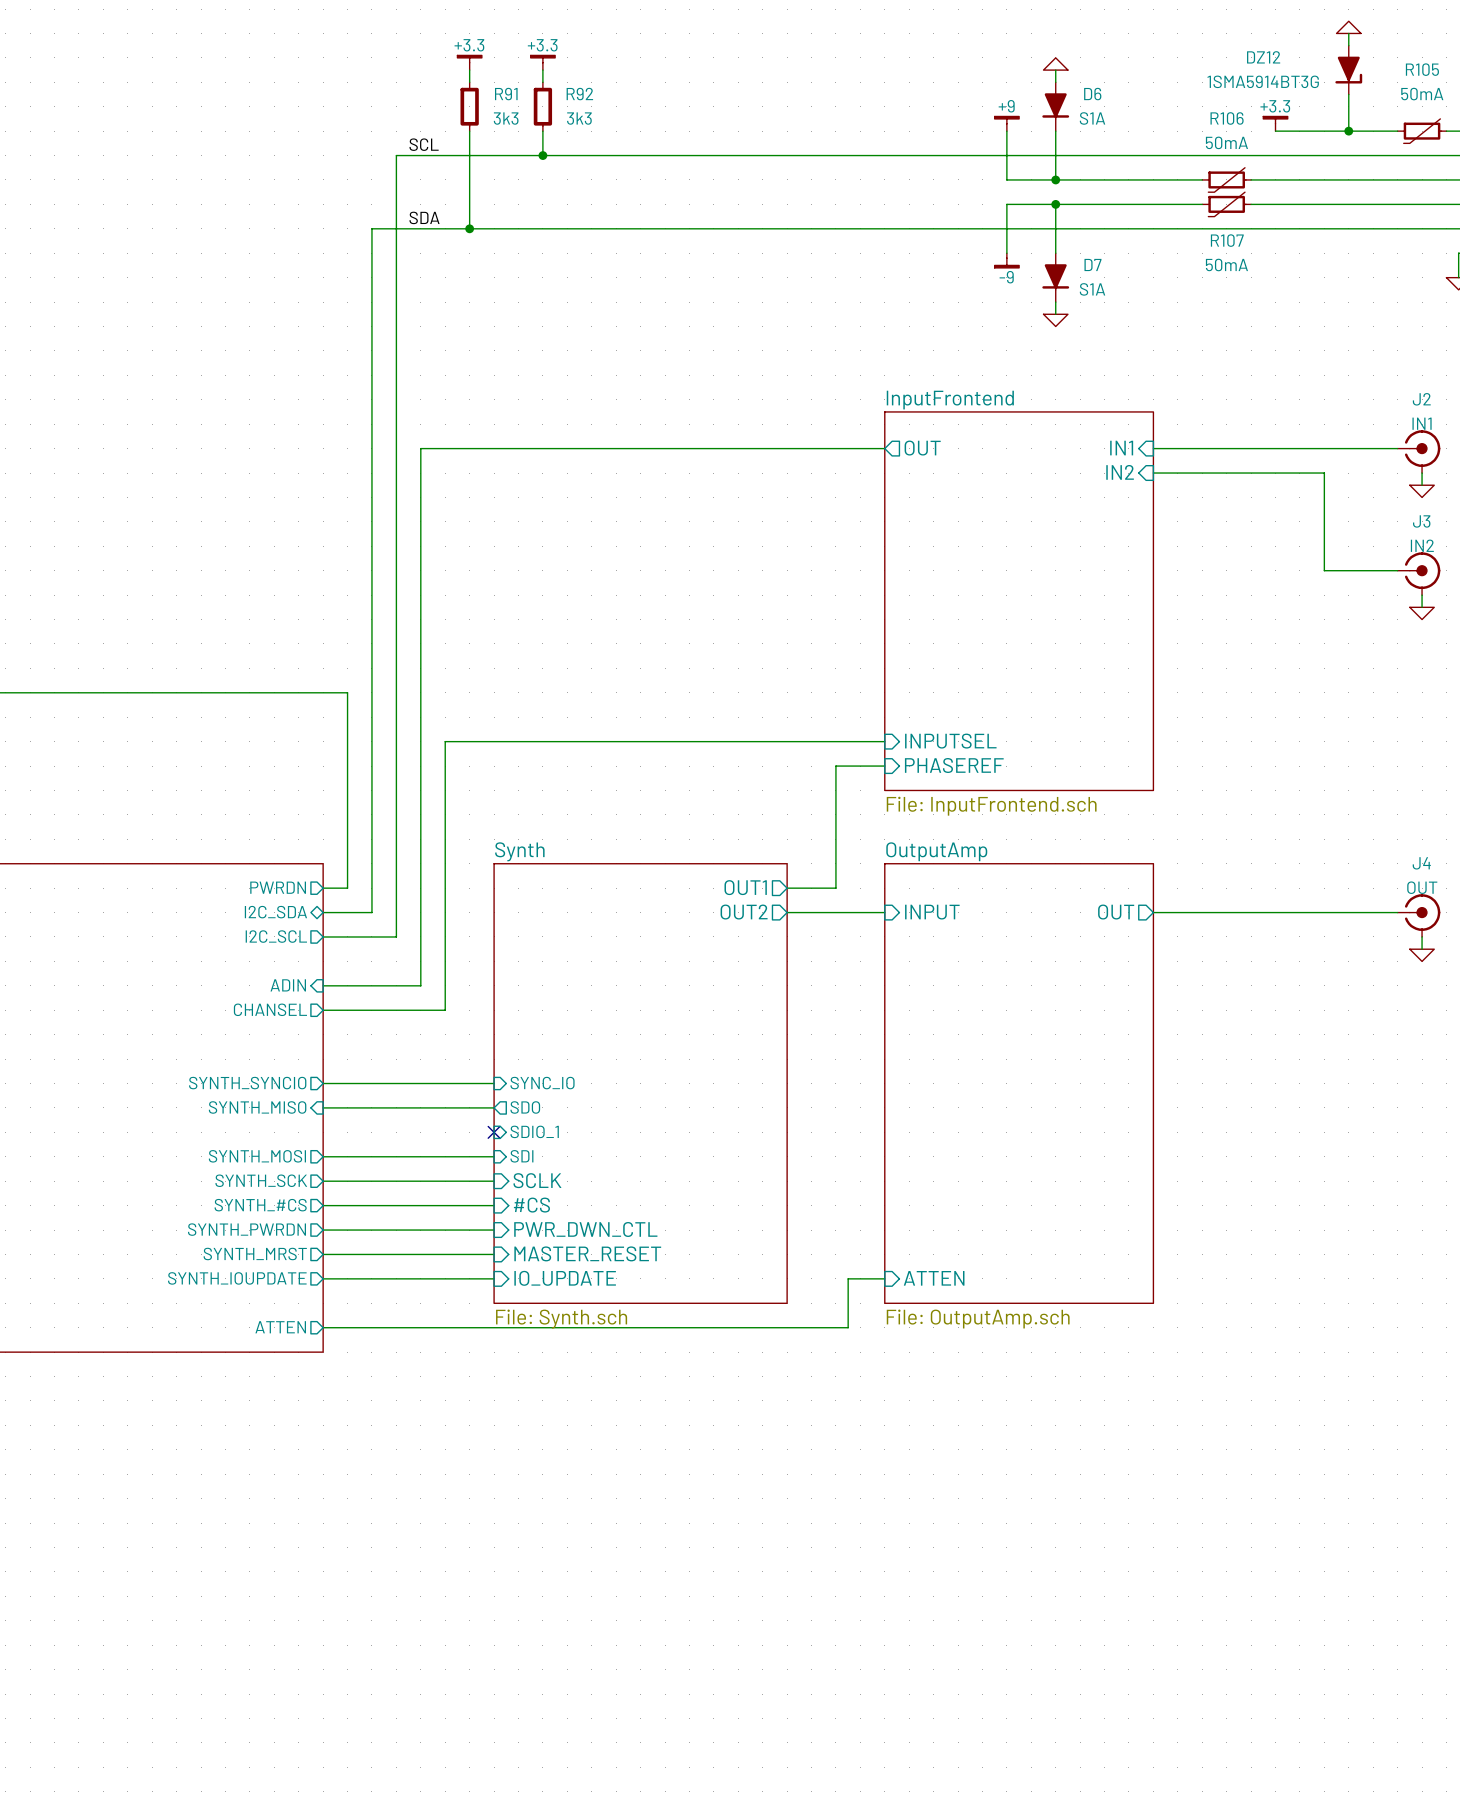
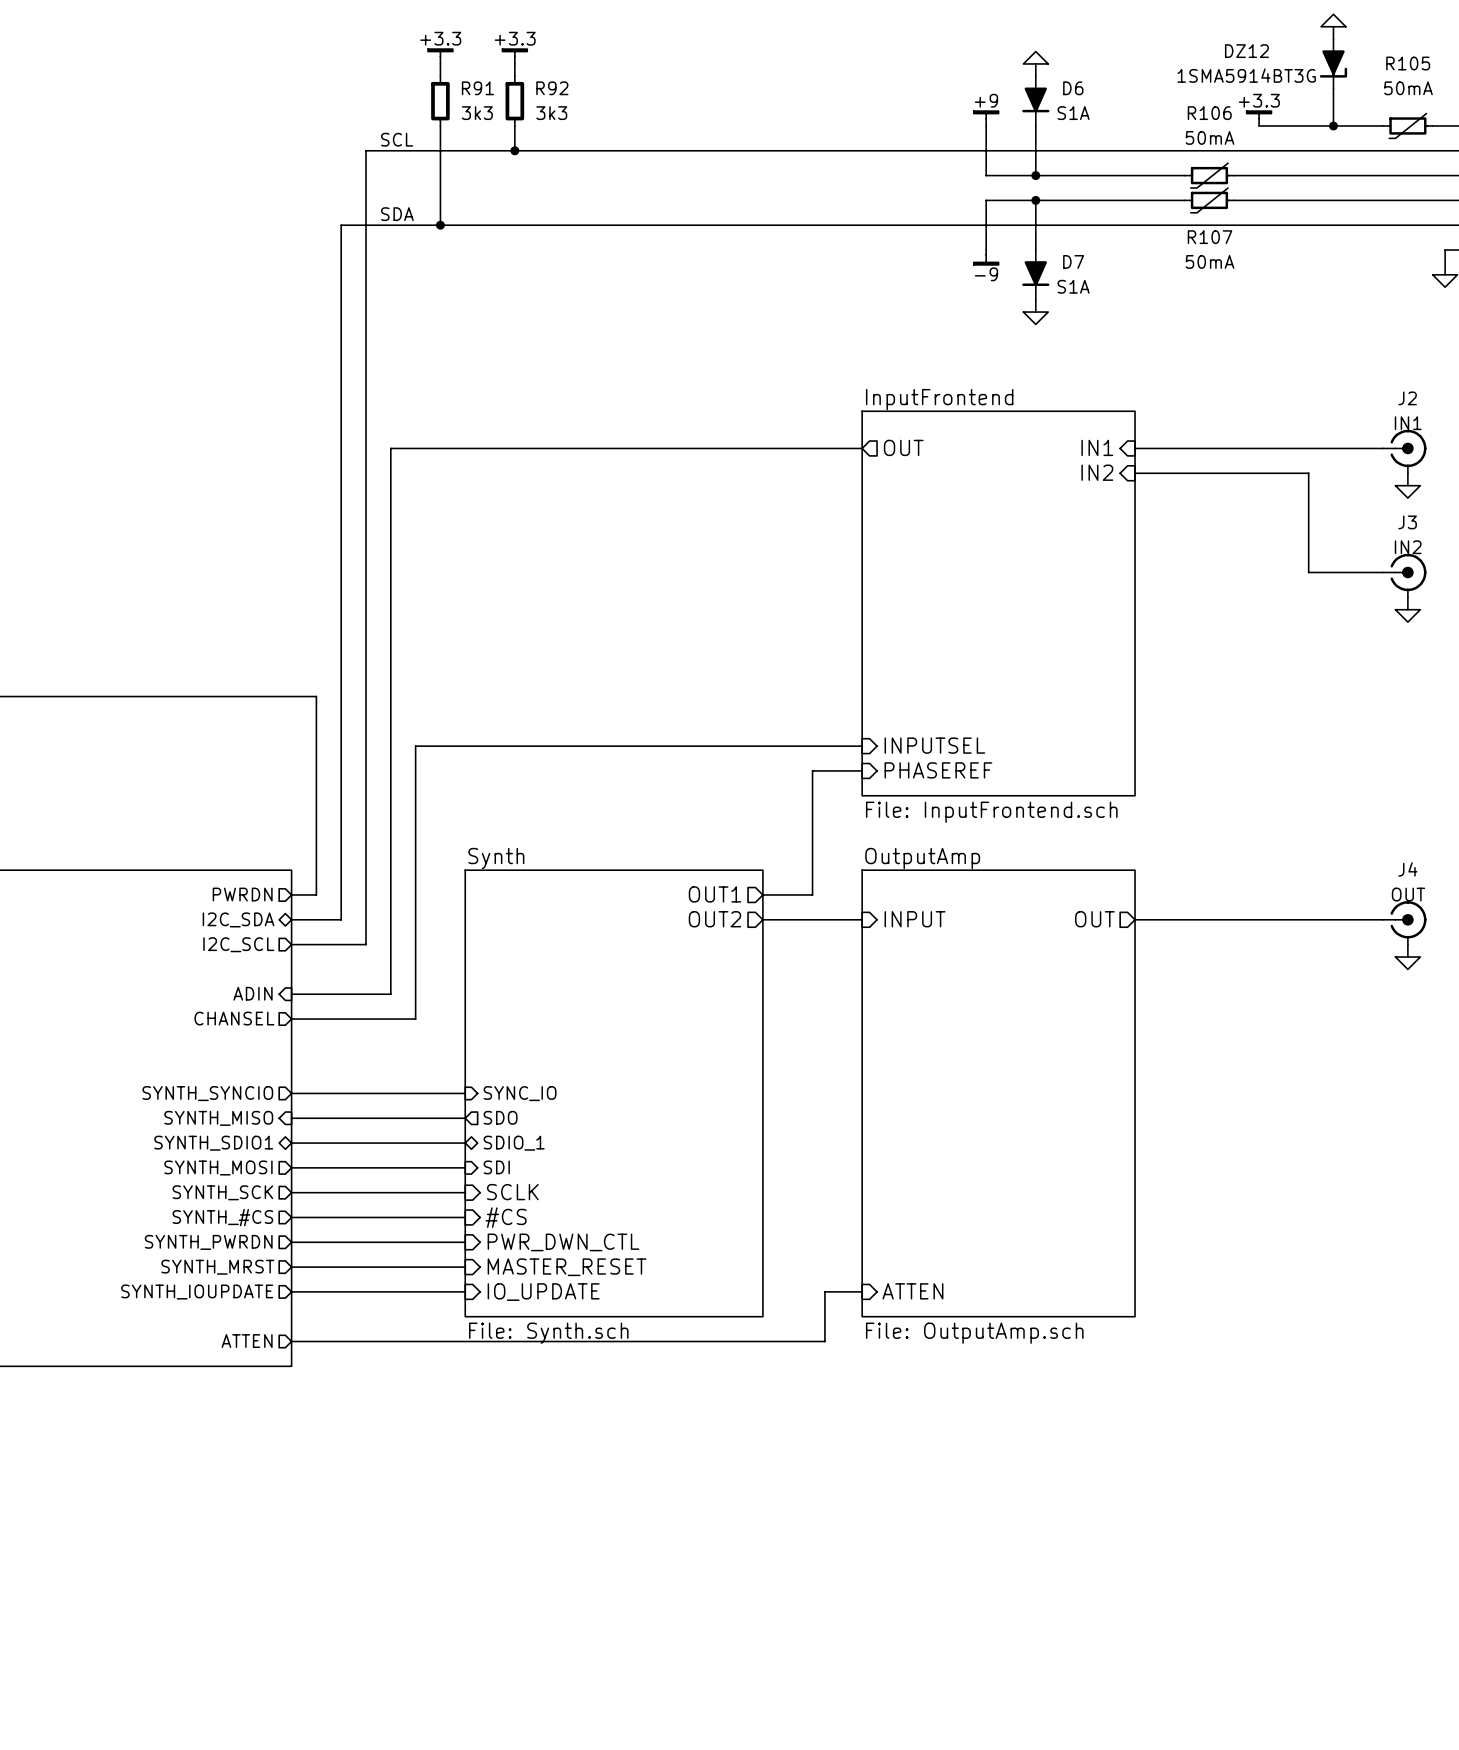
sheet pin: none -> SYNTH_SDIO1 (213, 1143)
sheet pin shape: input (534, 1131) -> bidirectional (514, 1143)
wire: none -> (291, 1143) (465, 1143)
no-connect mark: (494, 1132) -> none

